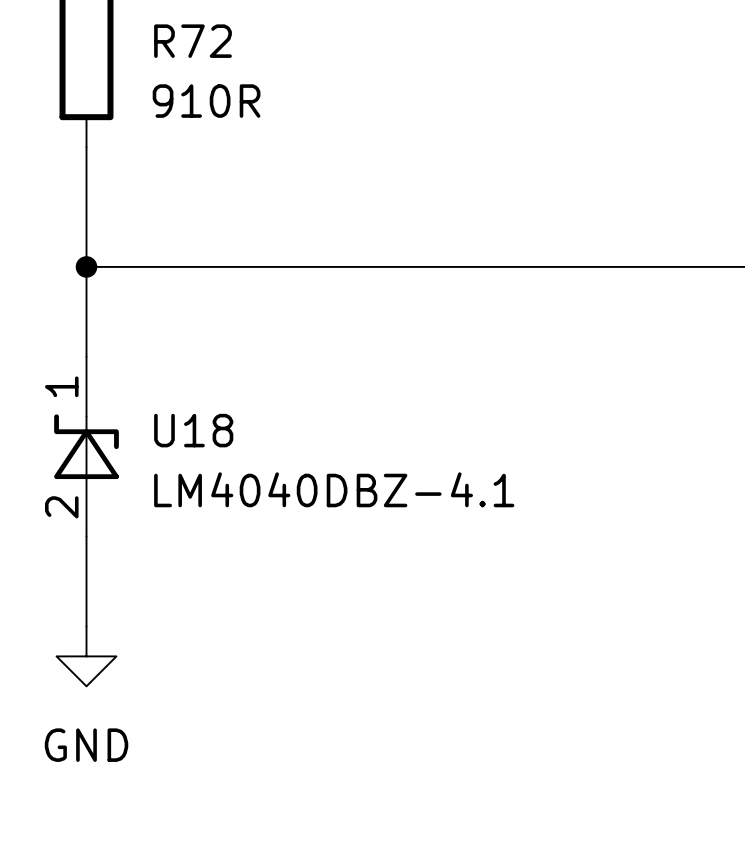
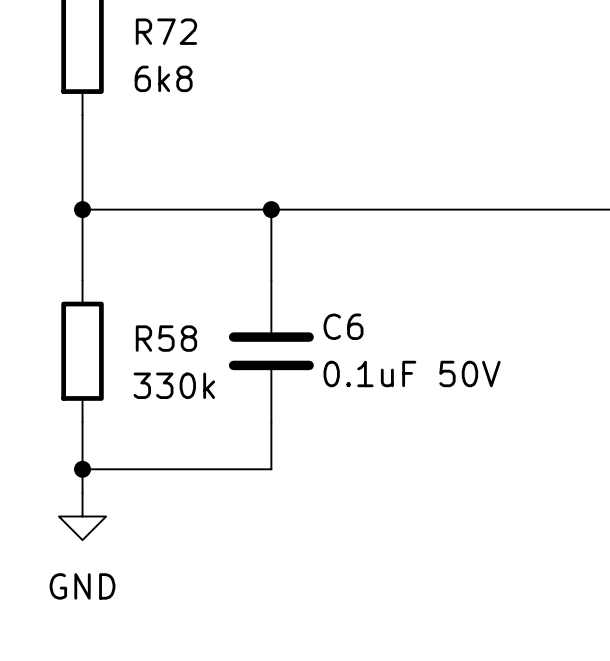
R72 value: 910R (206, 101) -> 6k8 (163, 78)
wire: none -> (271, 209) (271, 280)
junction: none -> (271, 209)
U18: LM4040DBZ-4.1 (86, 446) -> none
R58: none -> 330k (82, 351)
C6: none -> 0.1uF 50V (271, 351)
wire: none -> (271, 422) (271, 469) (82, 469)
junction: none -> (82, 469)

